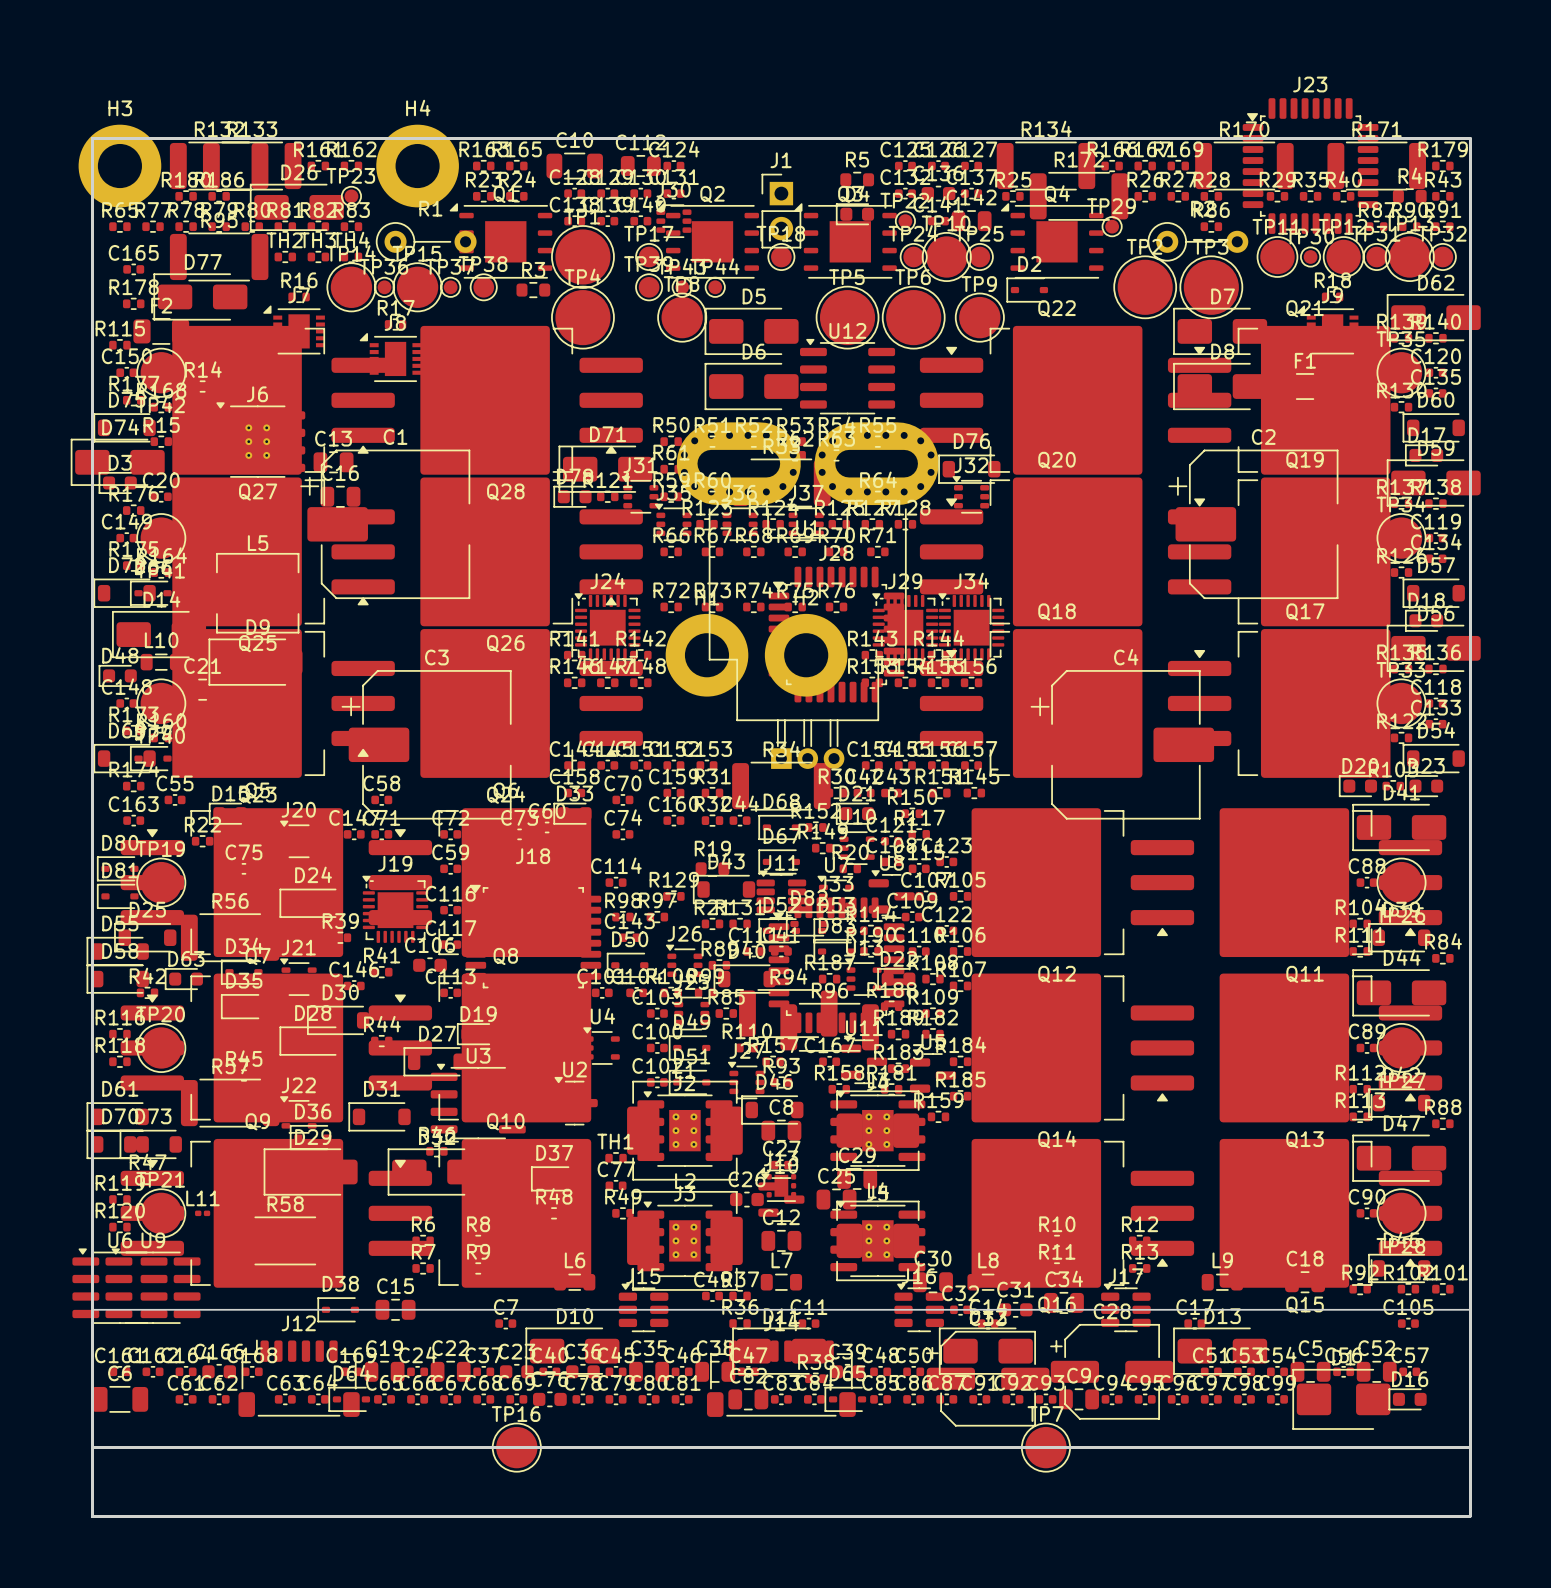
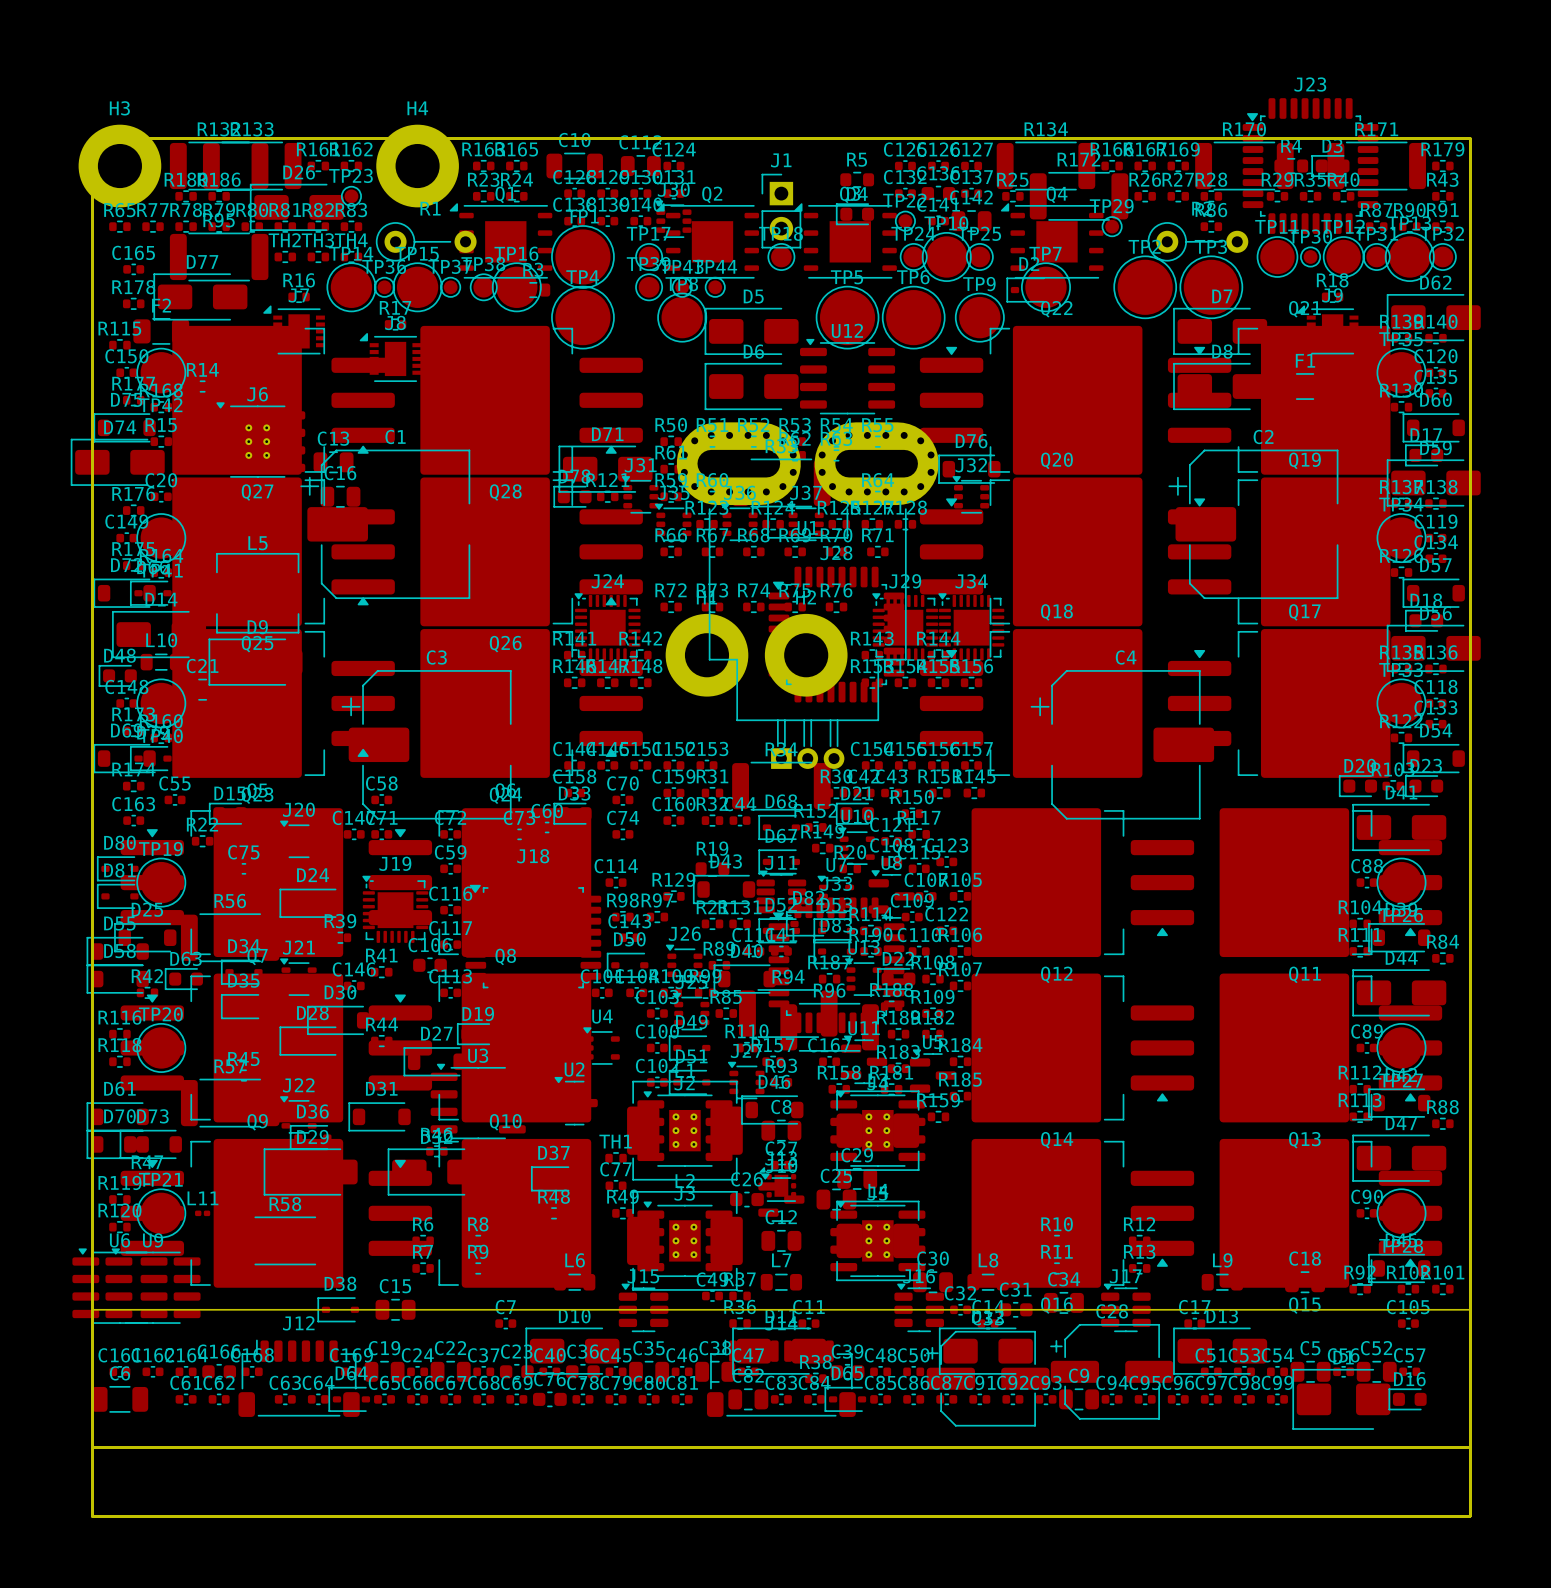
R4 position: (1409, 196) -> (1291, 166)
D3 position: (117, 482) -> (1330, 166)
TP16 position: (516, 1447) -> (516, 287)
TP7 position: (1045, 1447) -> (1045, 287)

